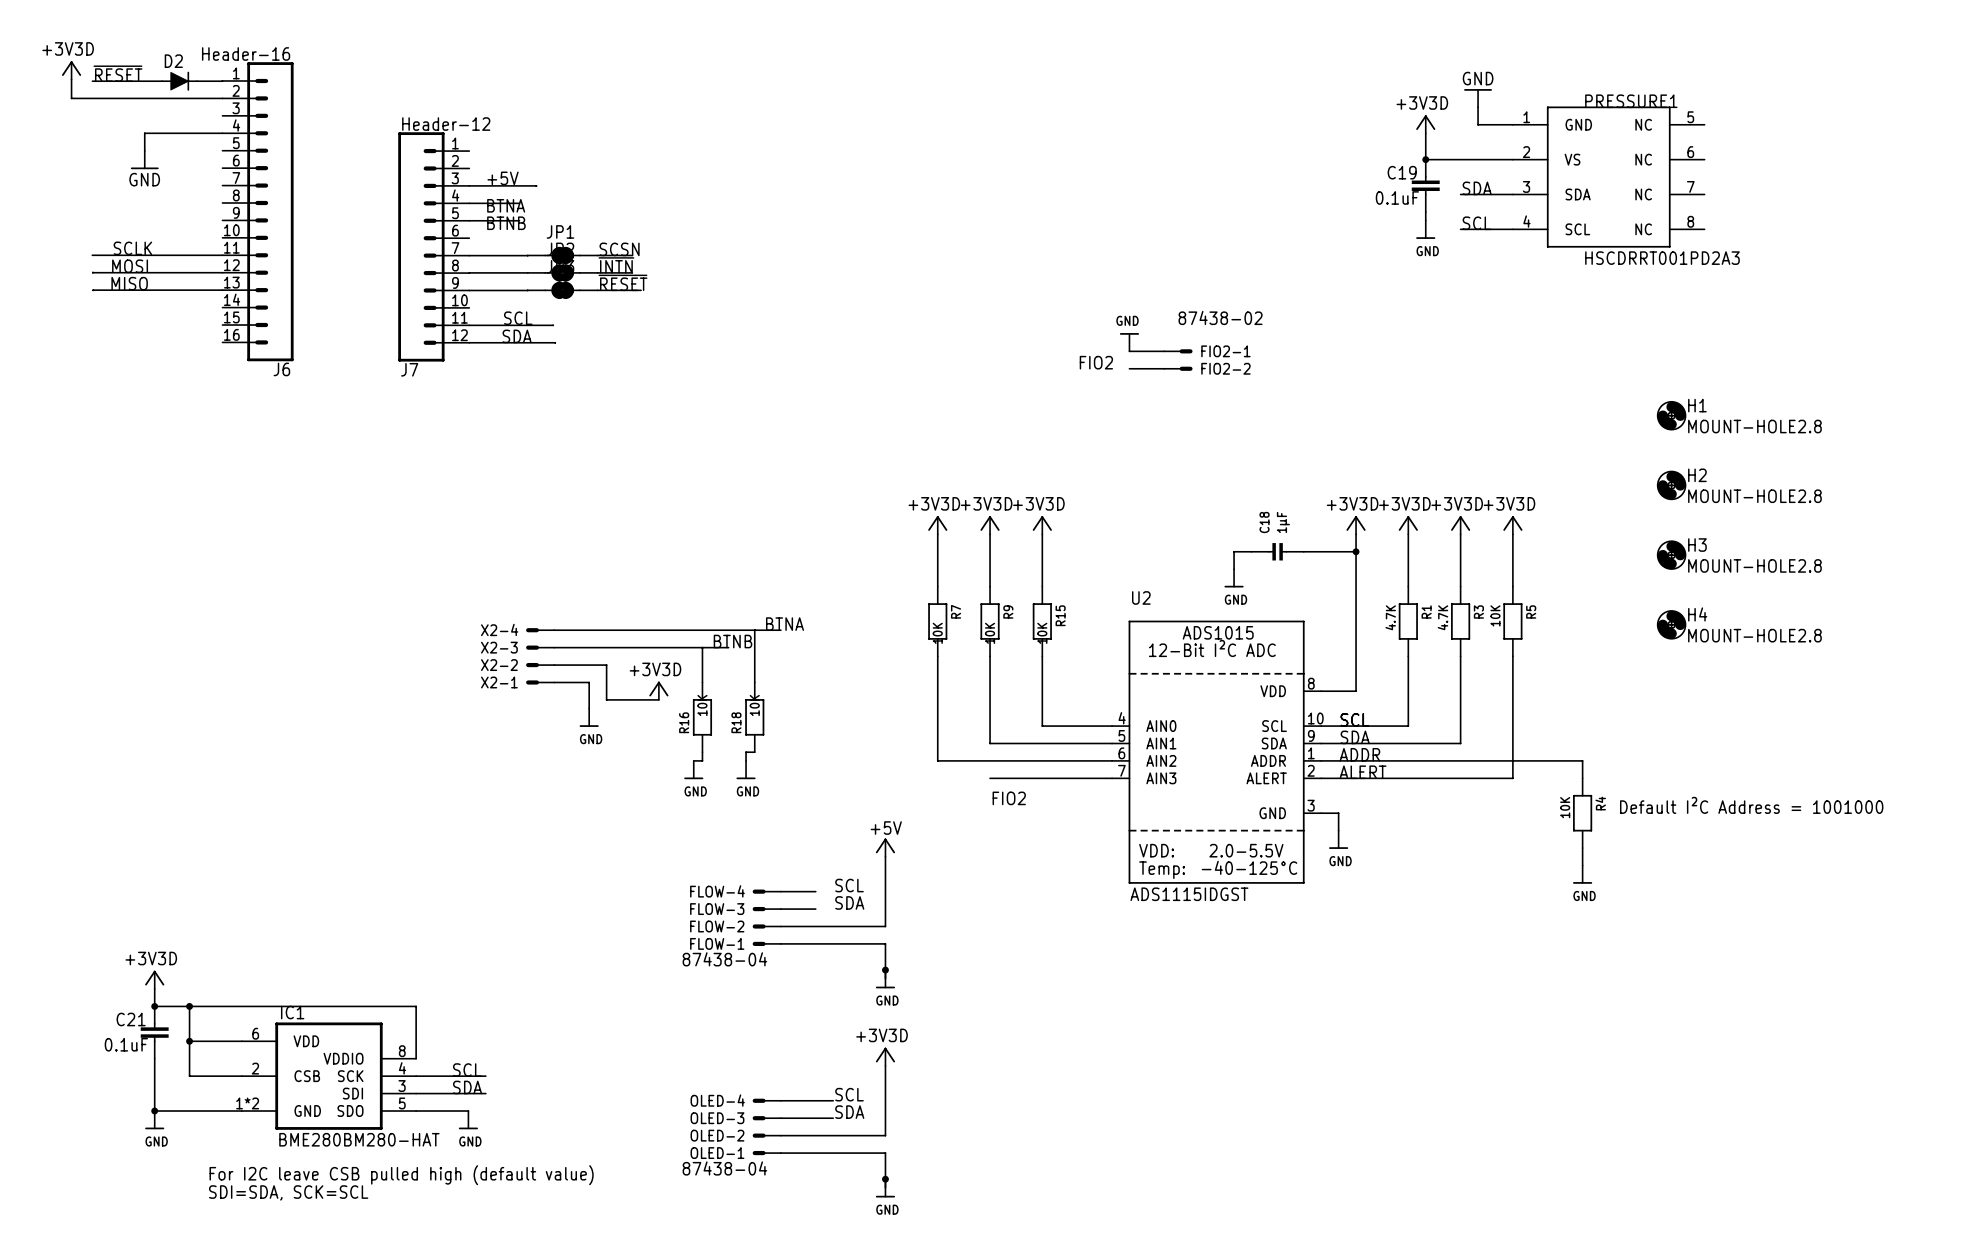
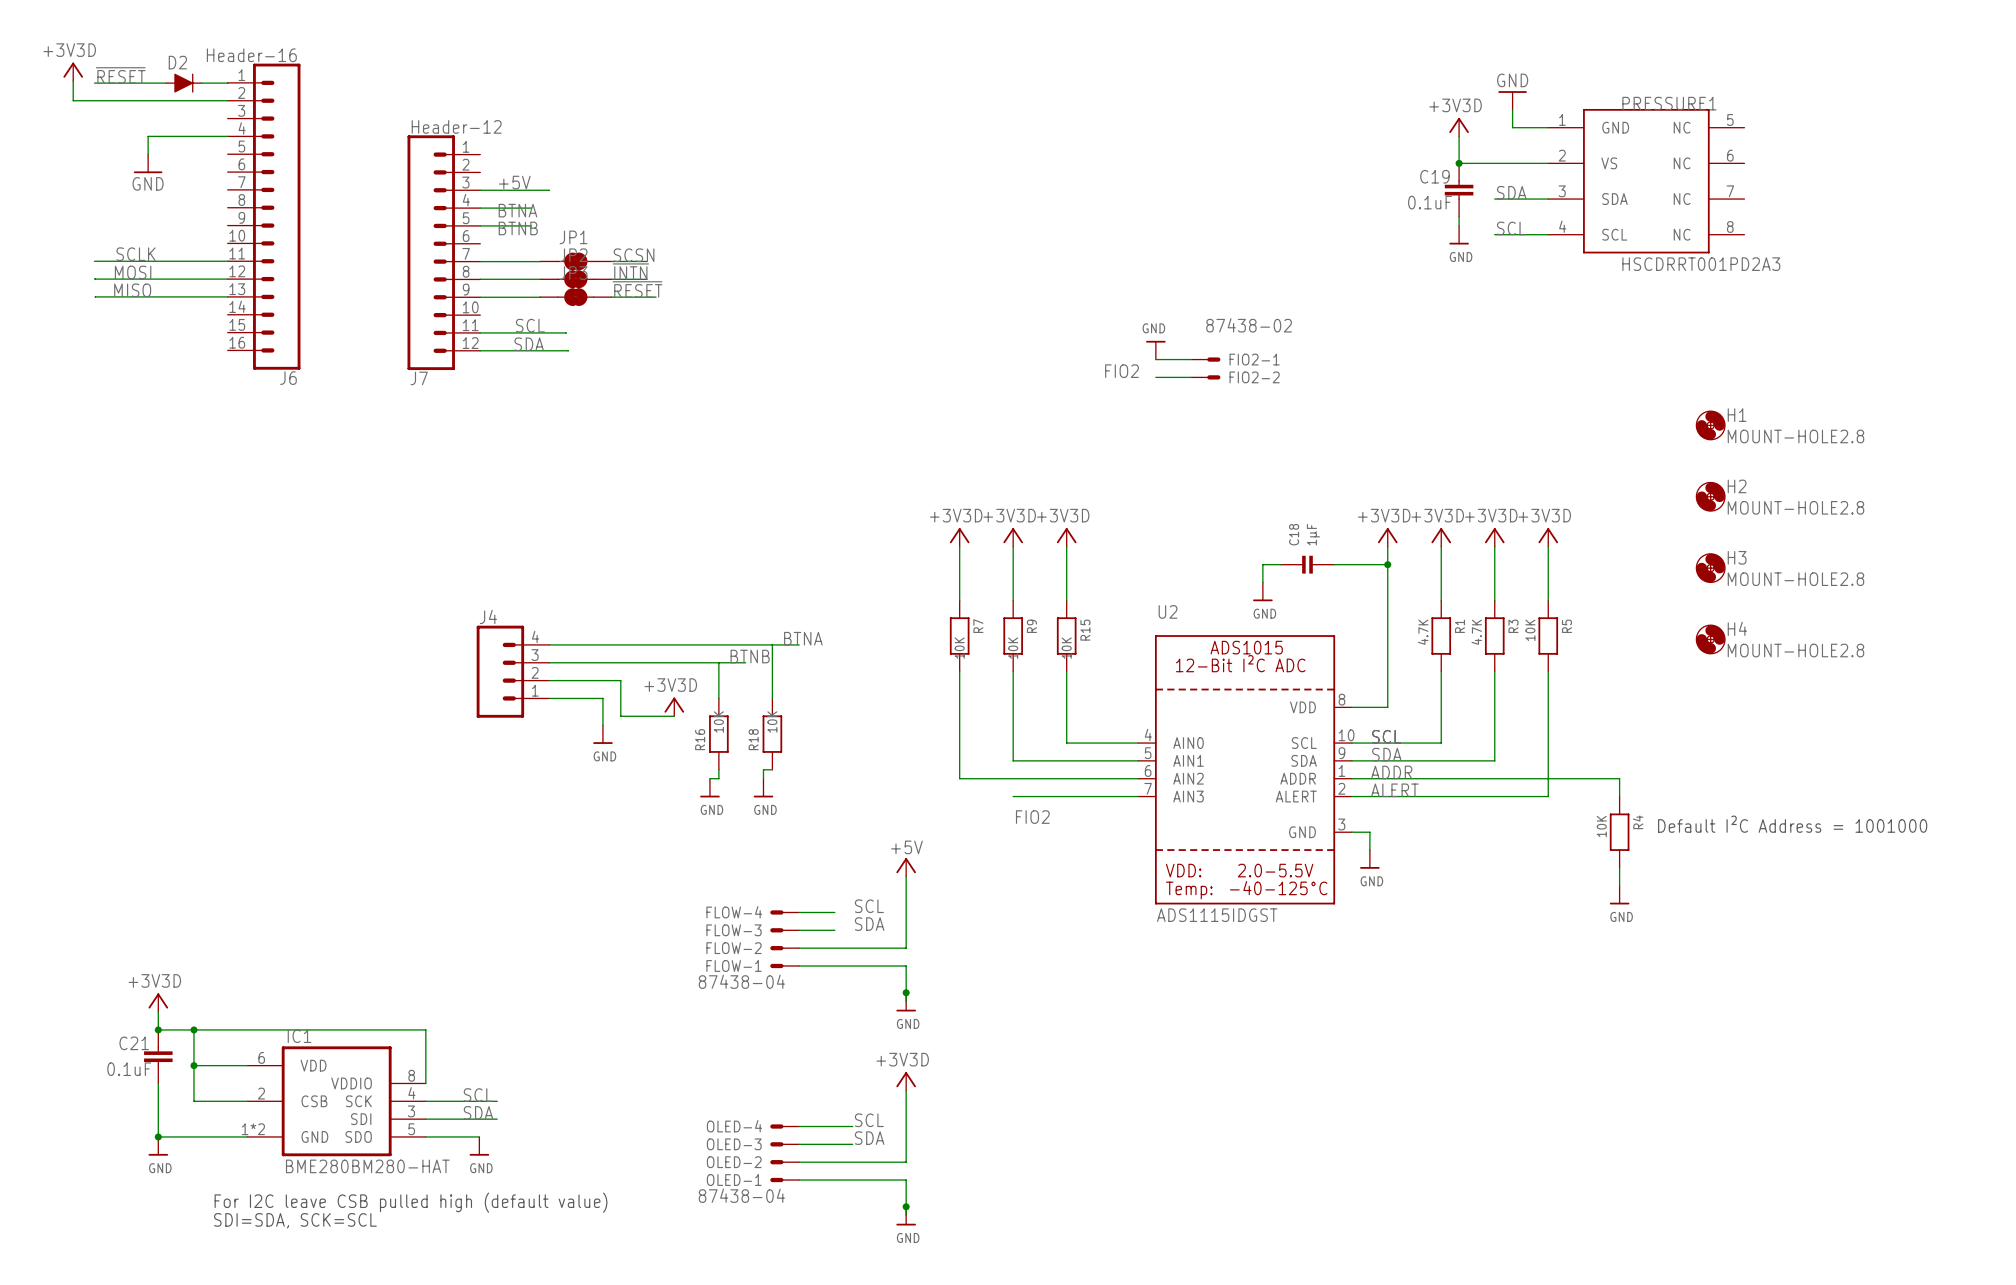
X2-4: (540, 630) -> none
X2-3: (540, 647) -> none
J4: none -> (513, 671)
X2-2: (540, 665) -> none
X2-1: (540, 682) -> none

